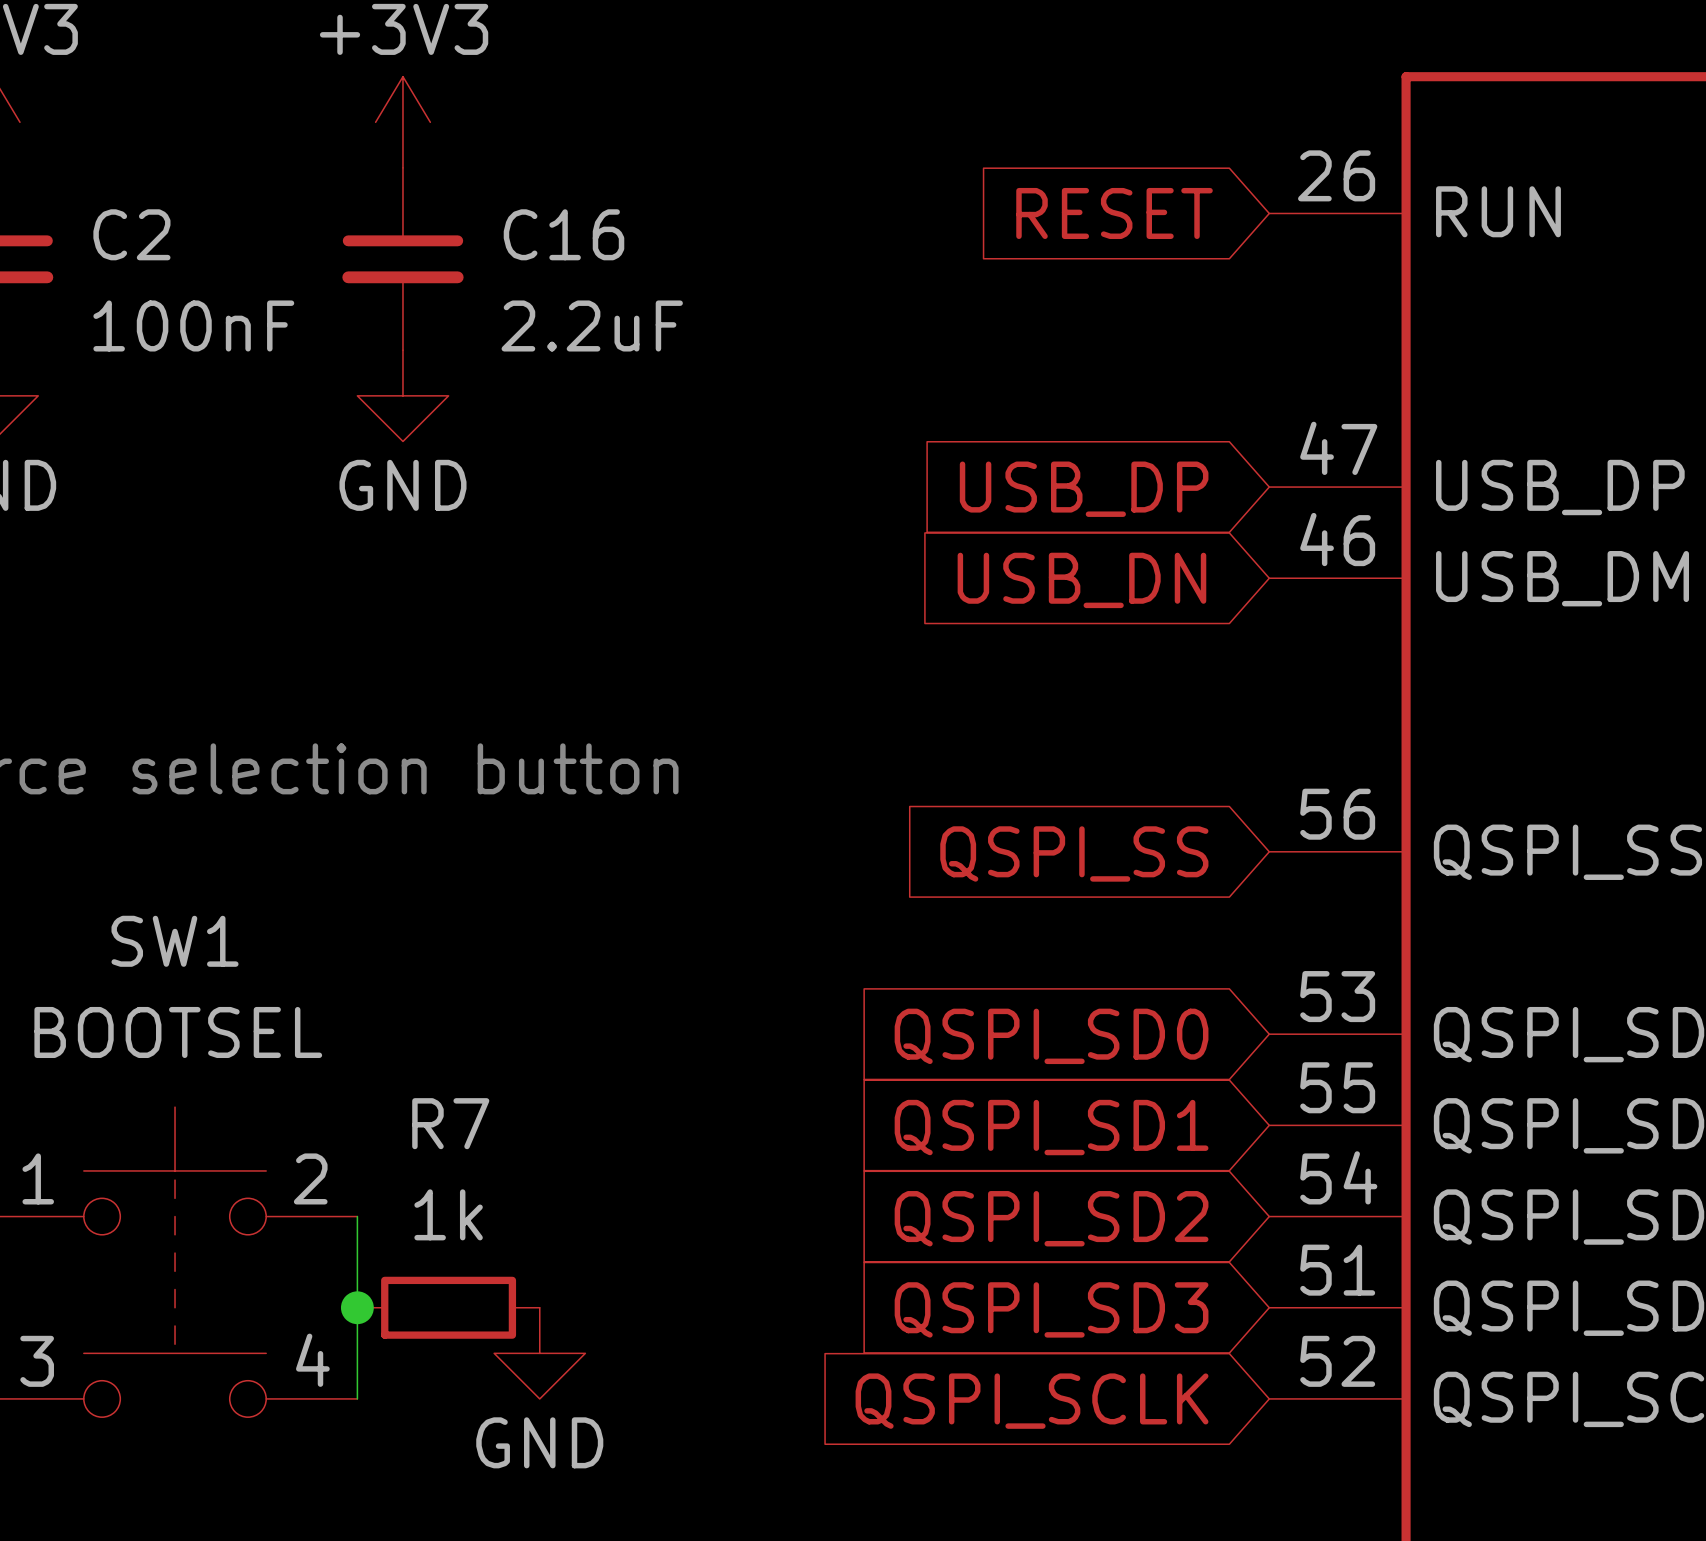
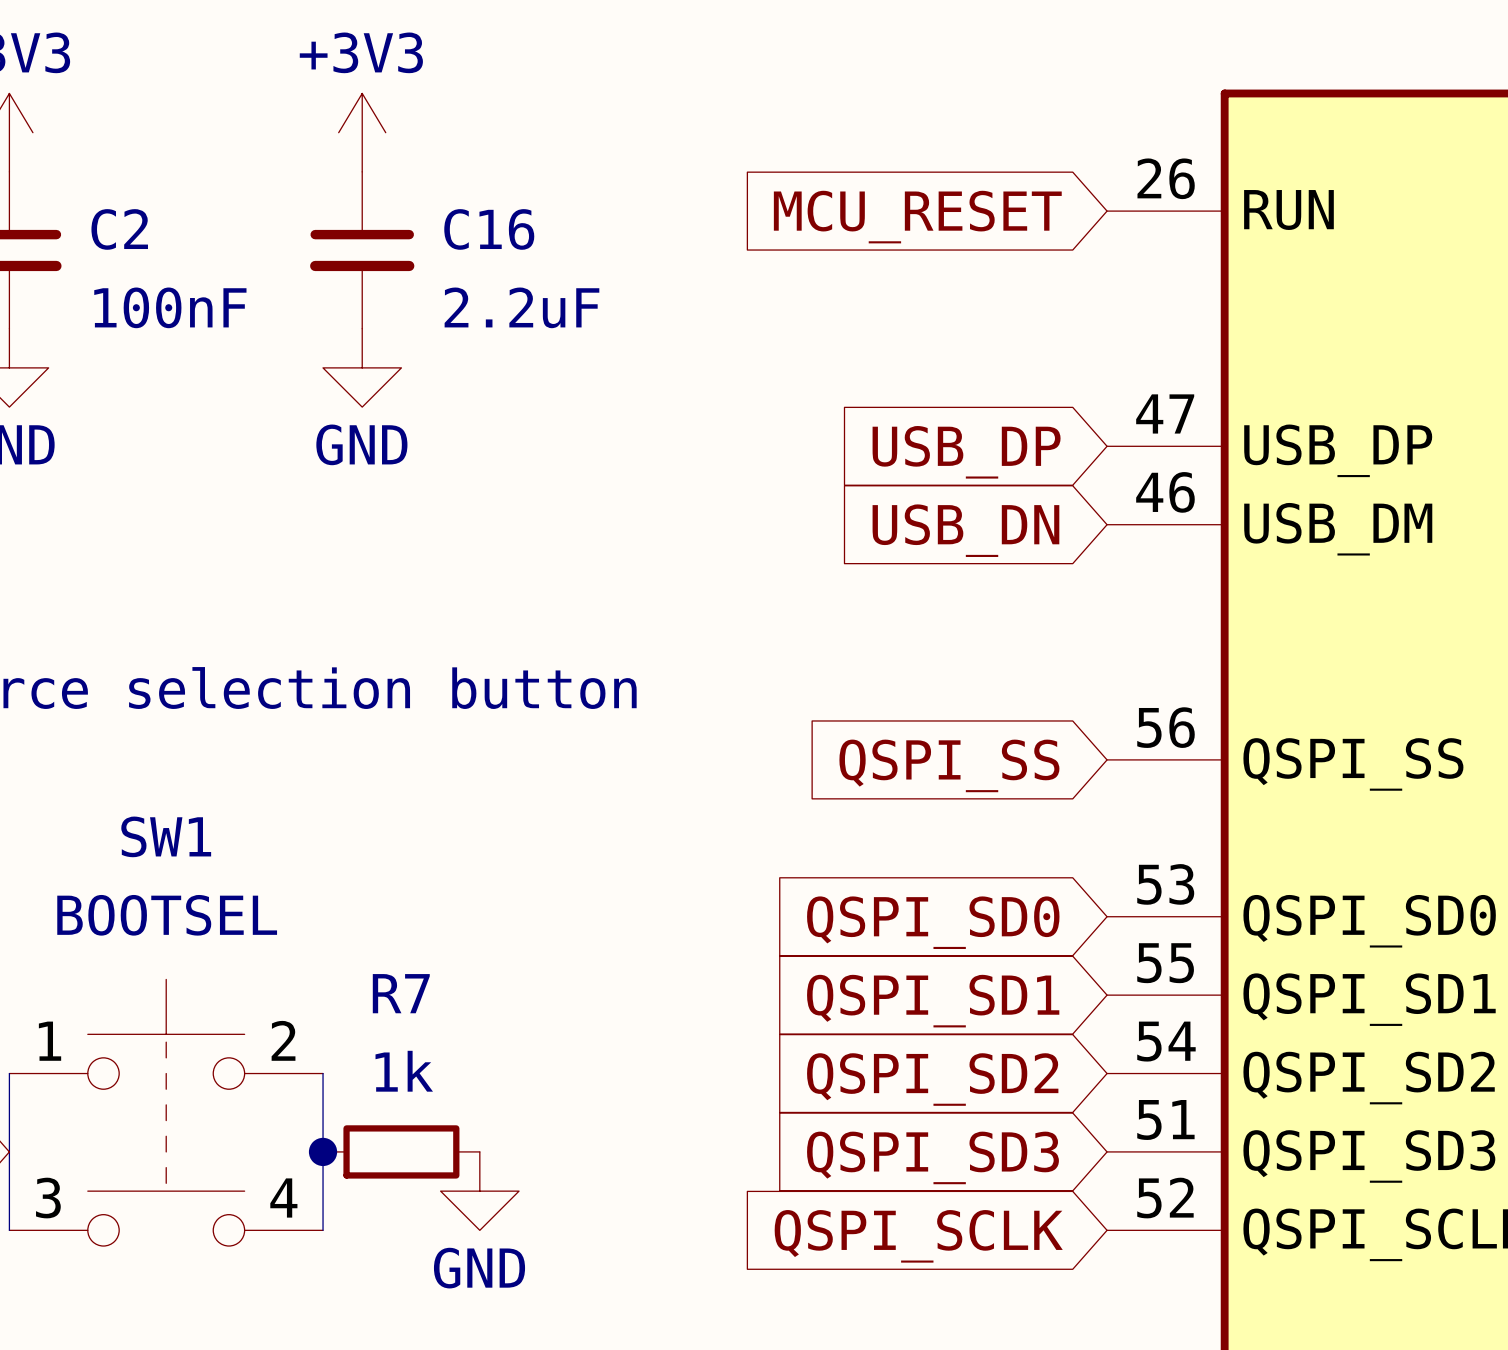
global label: RESET (1114, 213) -> MCU_RESET (917, 217)

